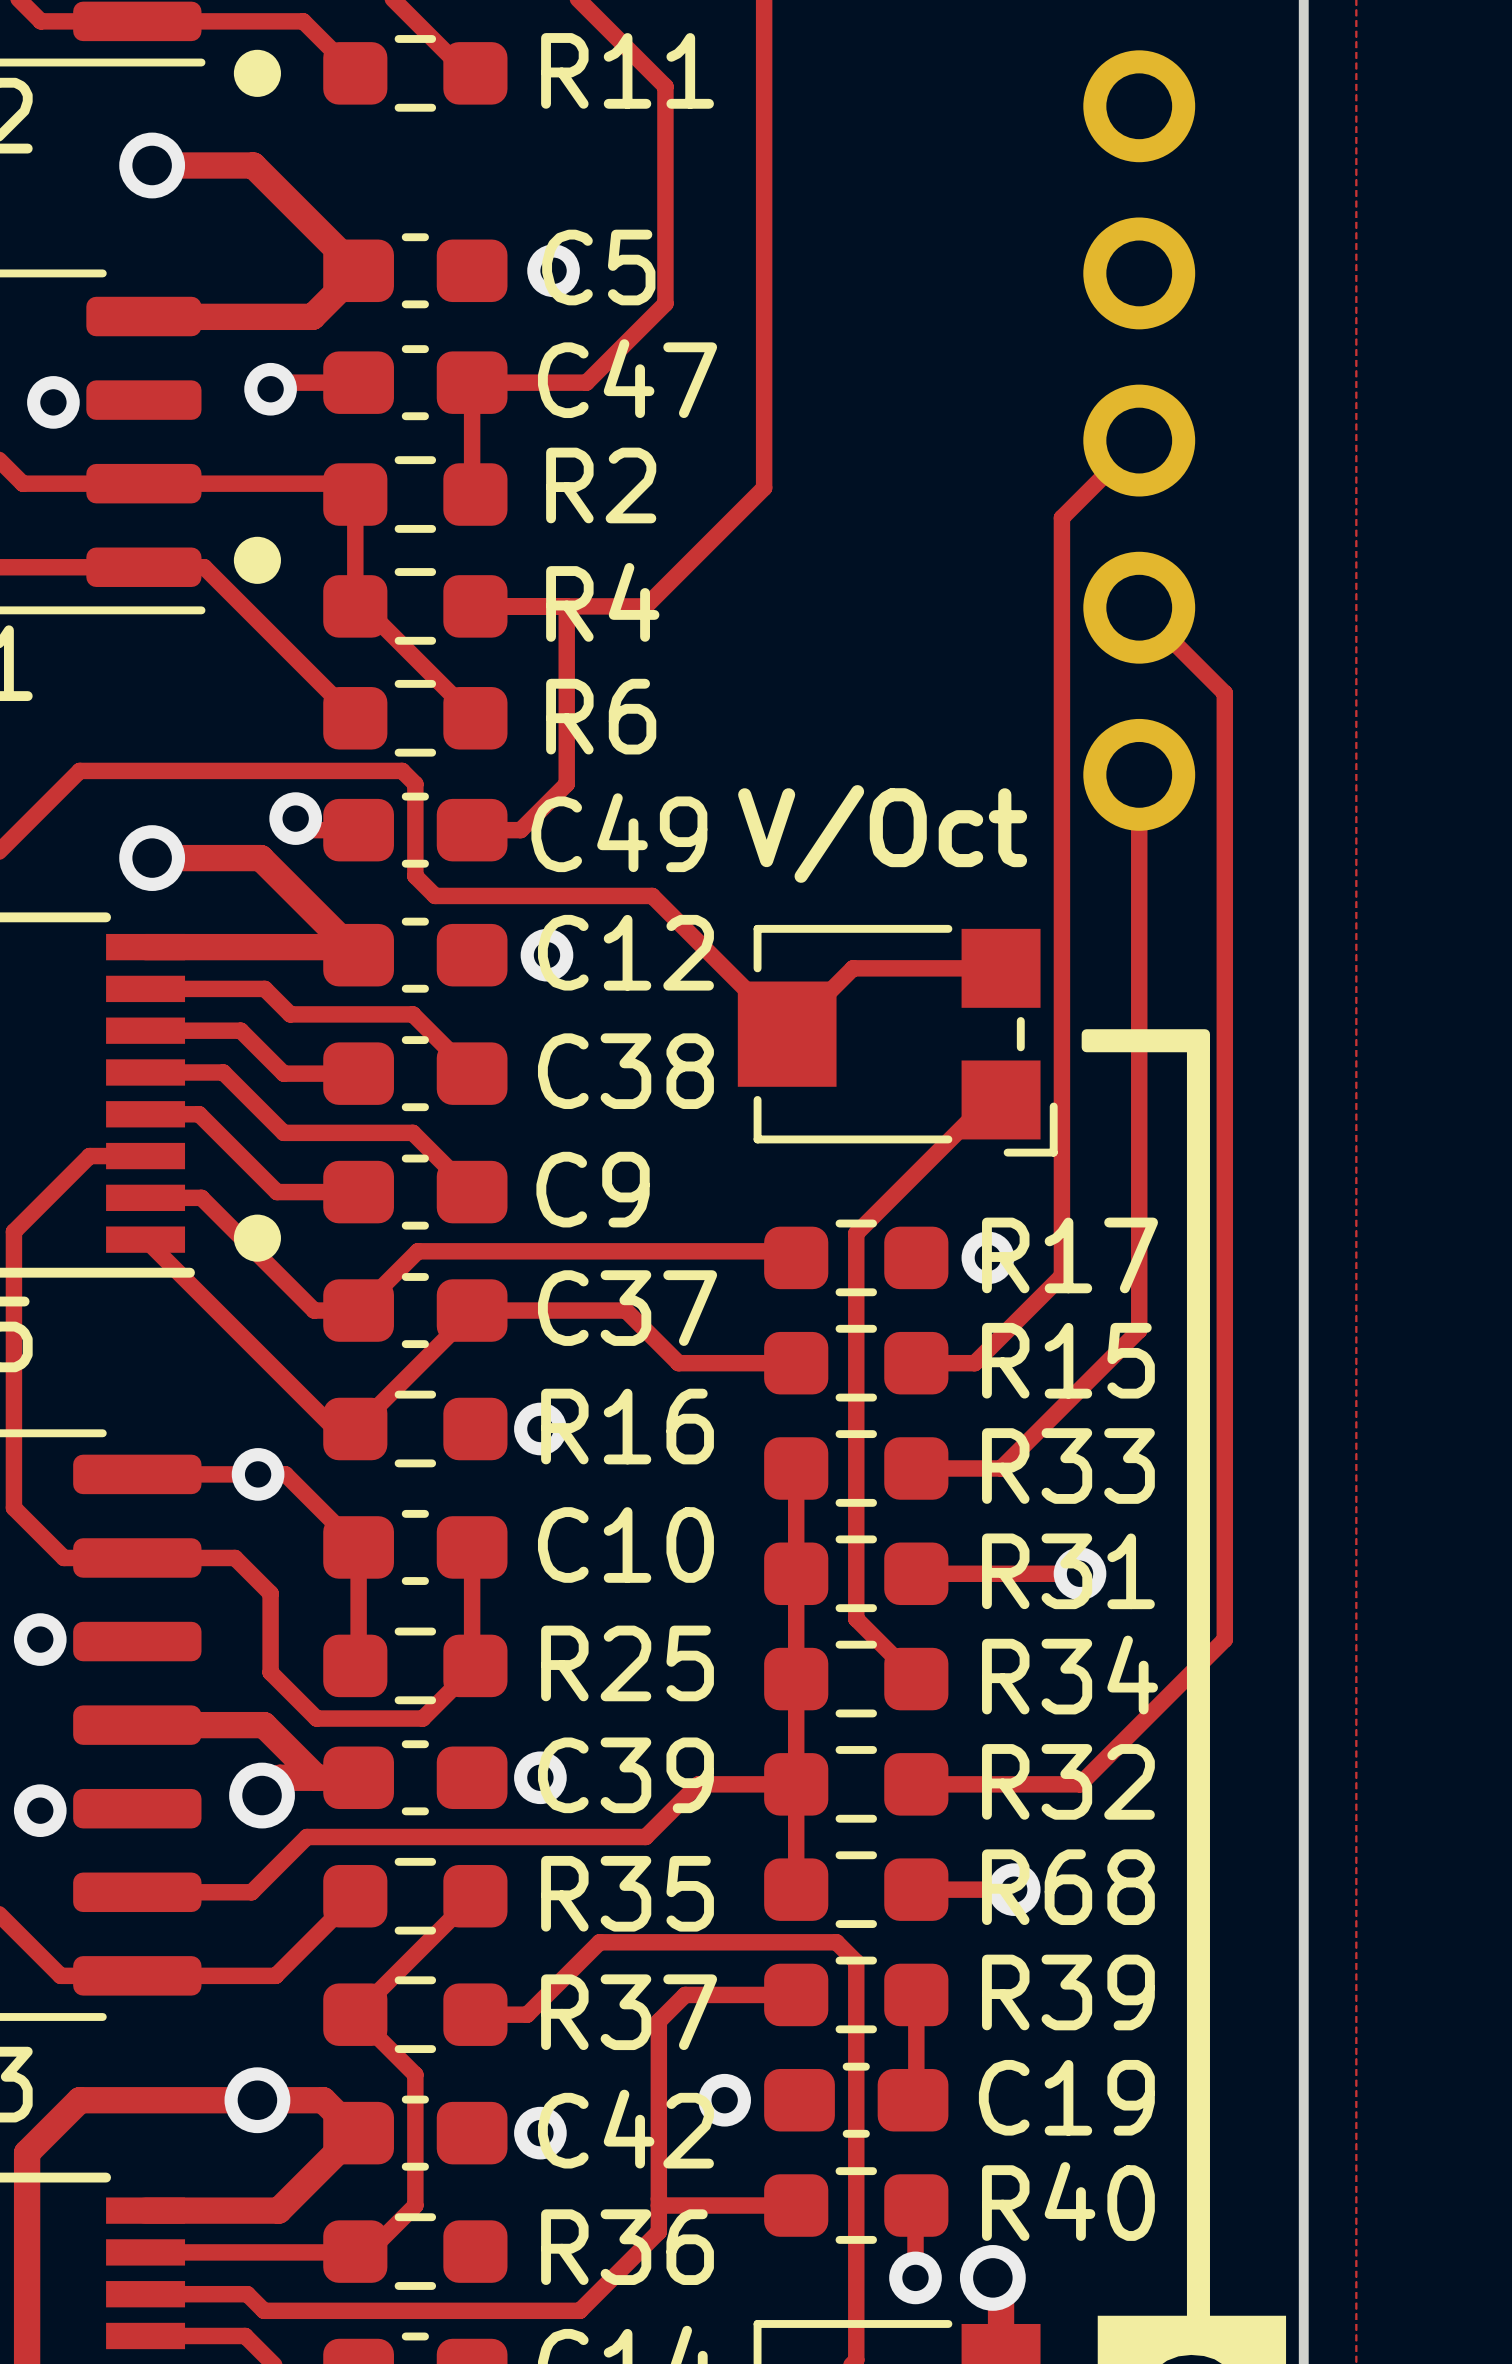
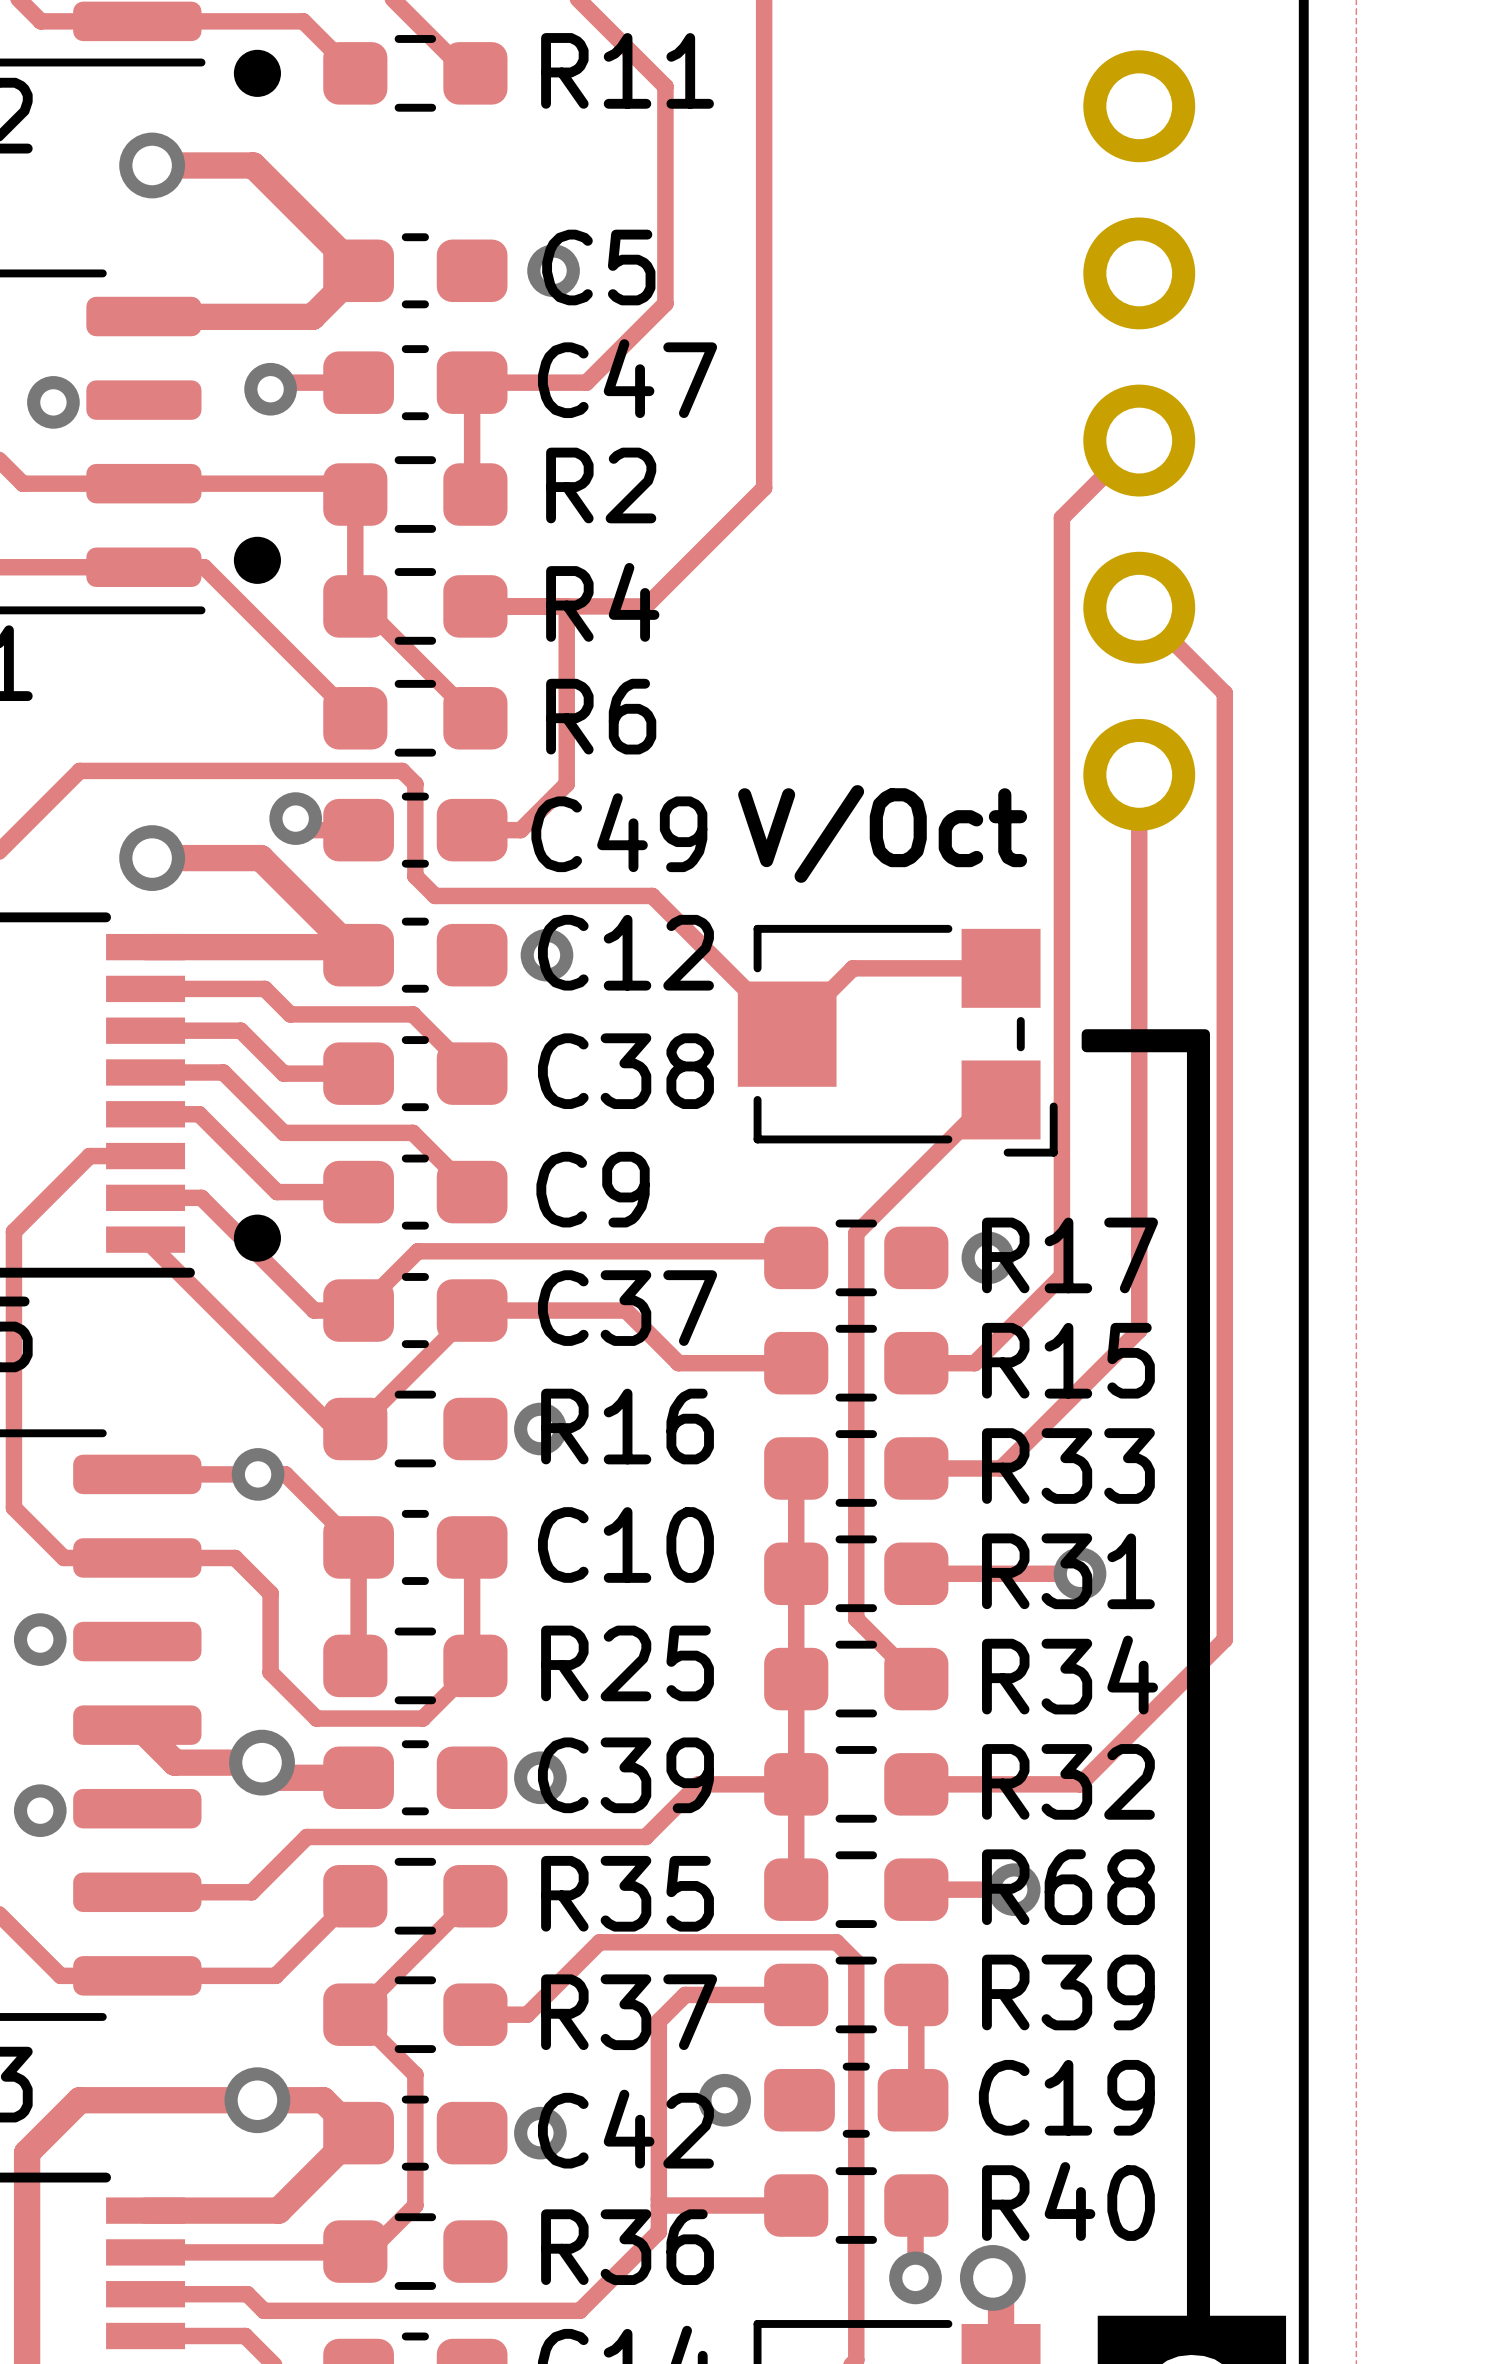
track: (137, 1725) (264, 1725) (316, 1777) -> (137, 1725) (174, 1762) (262, 1762) (277, 1777) (279, 1777)
via position: (262, 1795) -> (262, 1762)

